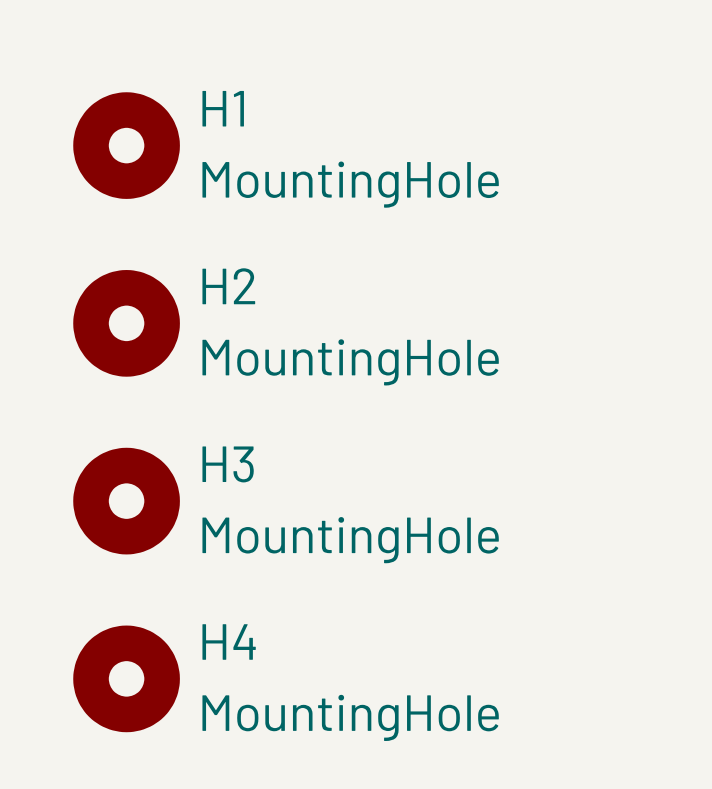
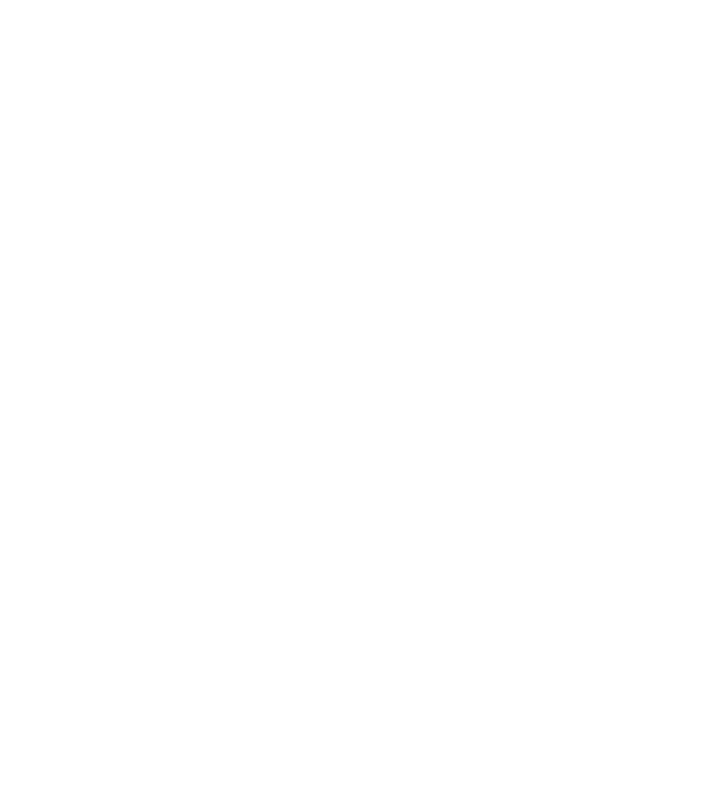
H1: MountingHole (126, 145) -> none
H2: MountingHole (126, 323) -> none
H3: MountingHole (126, 501) -> none
H4: MountingHole (126, 678) -> none

